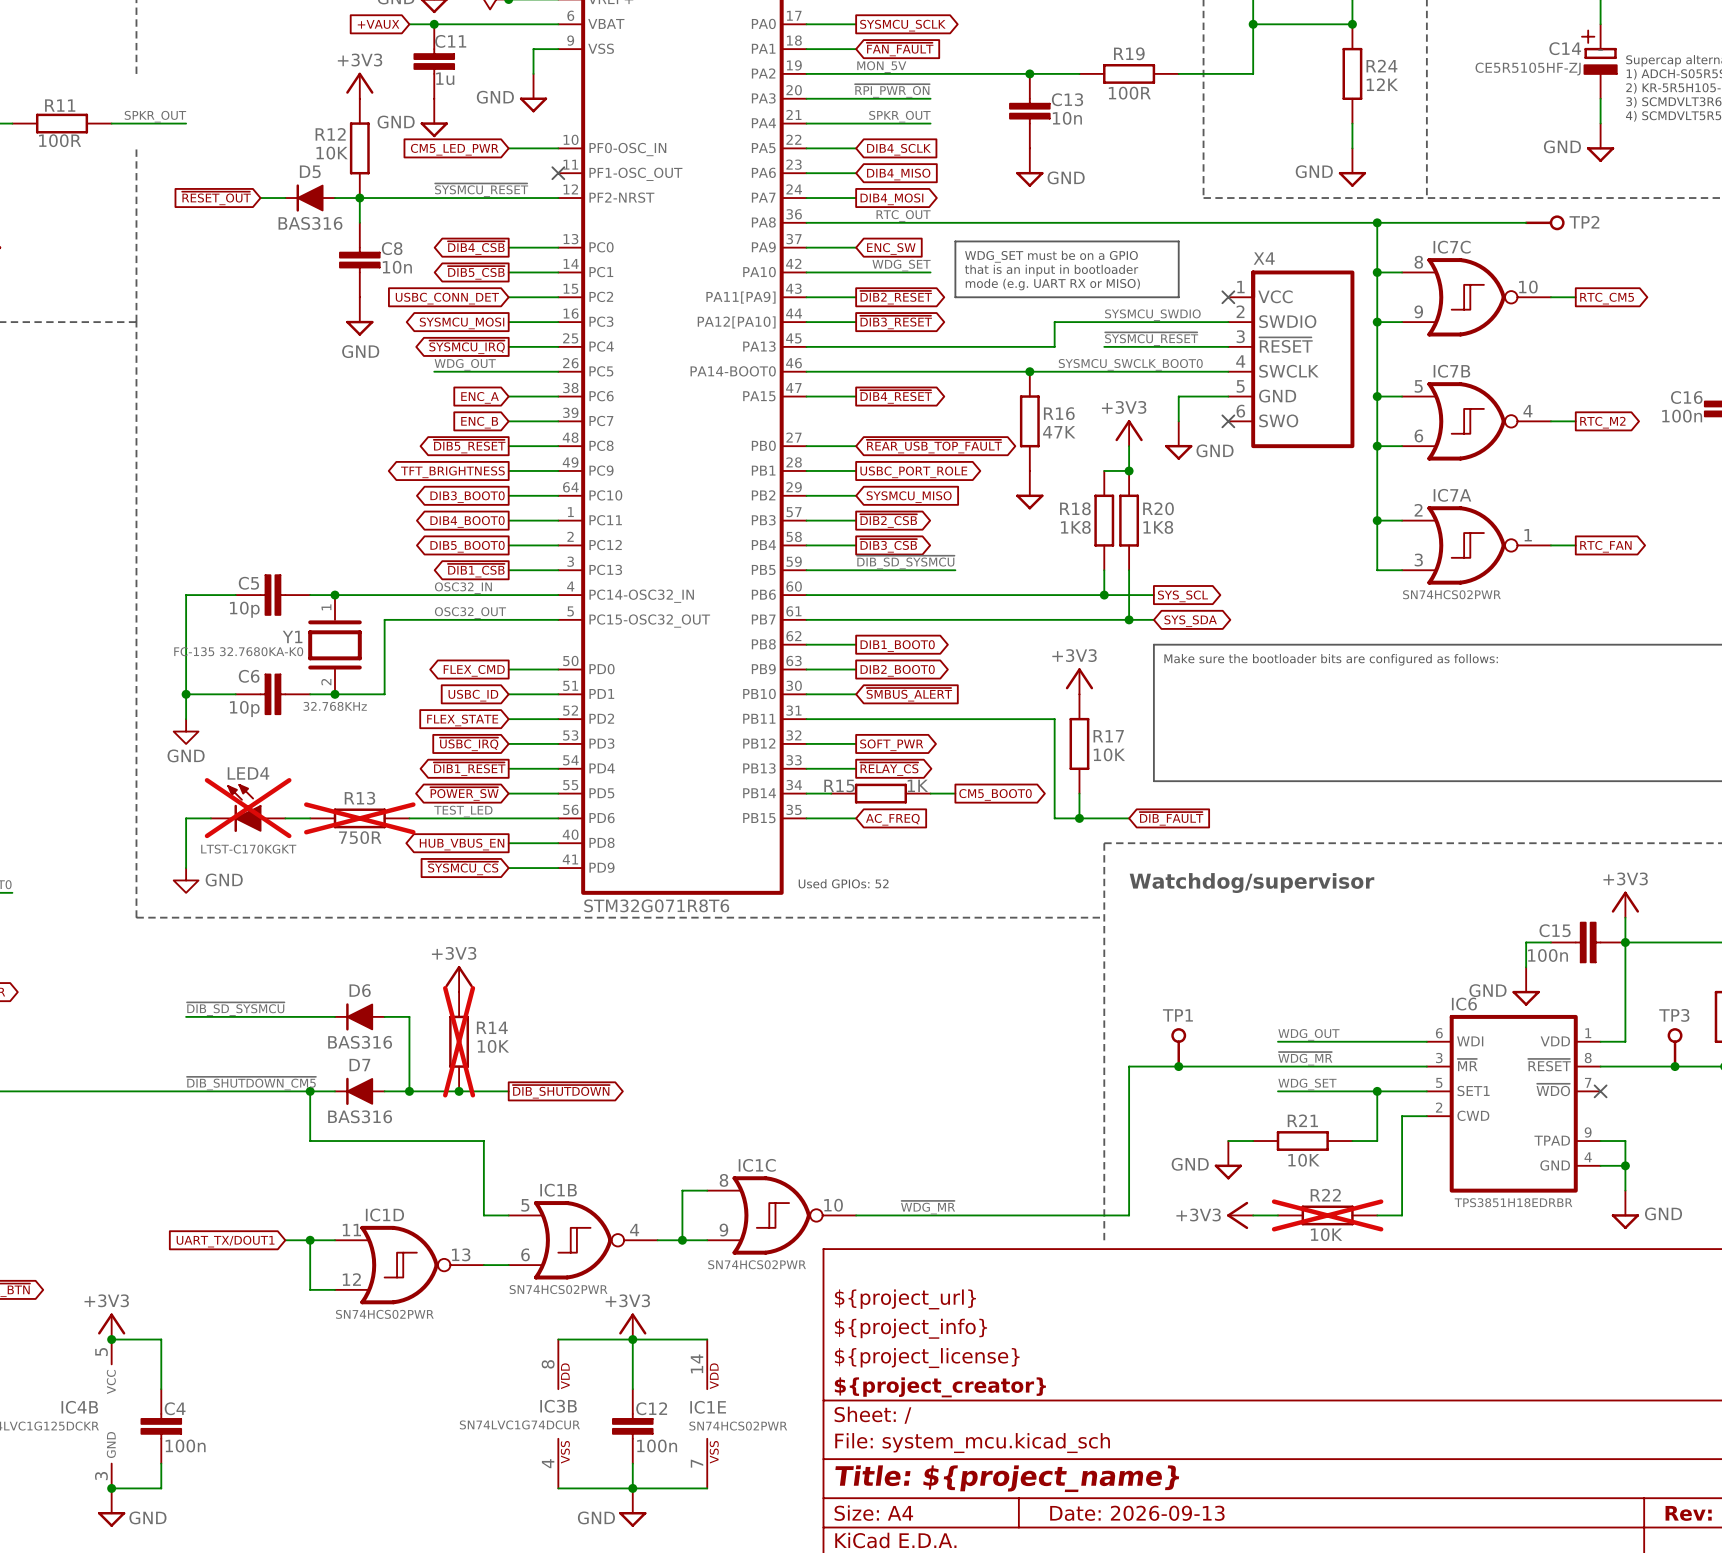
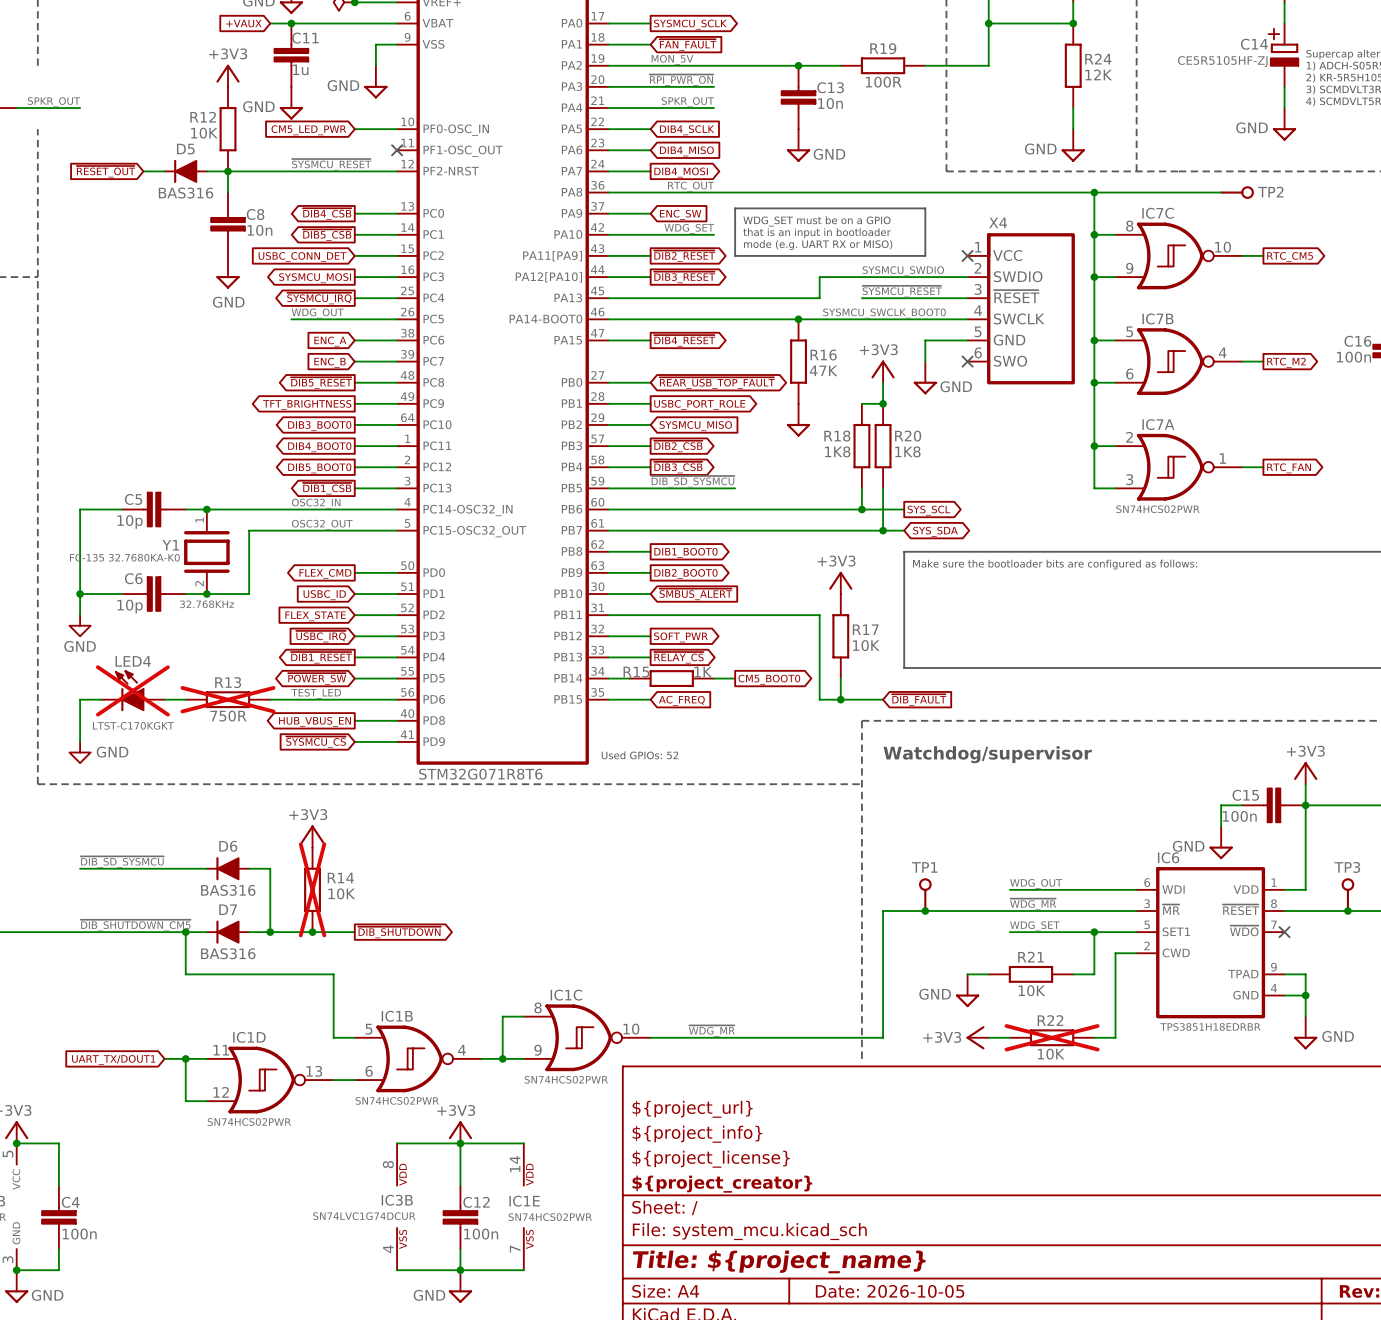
title block: Date: 2026-09-13 (1137, 1513) -> Date: 2026-10-05 (890, 1291)

